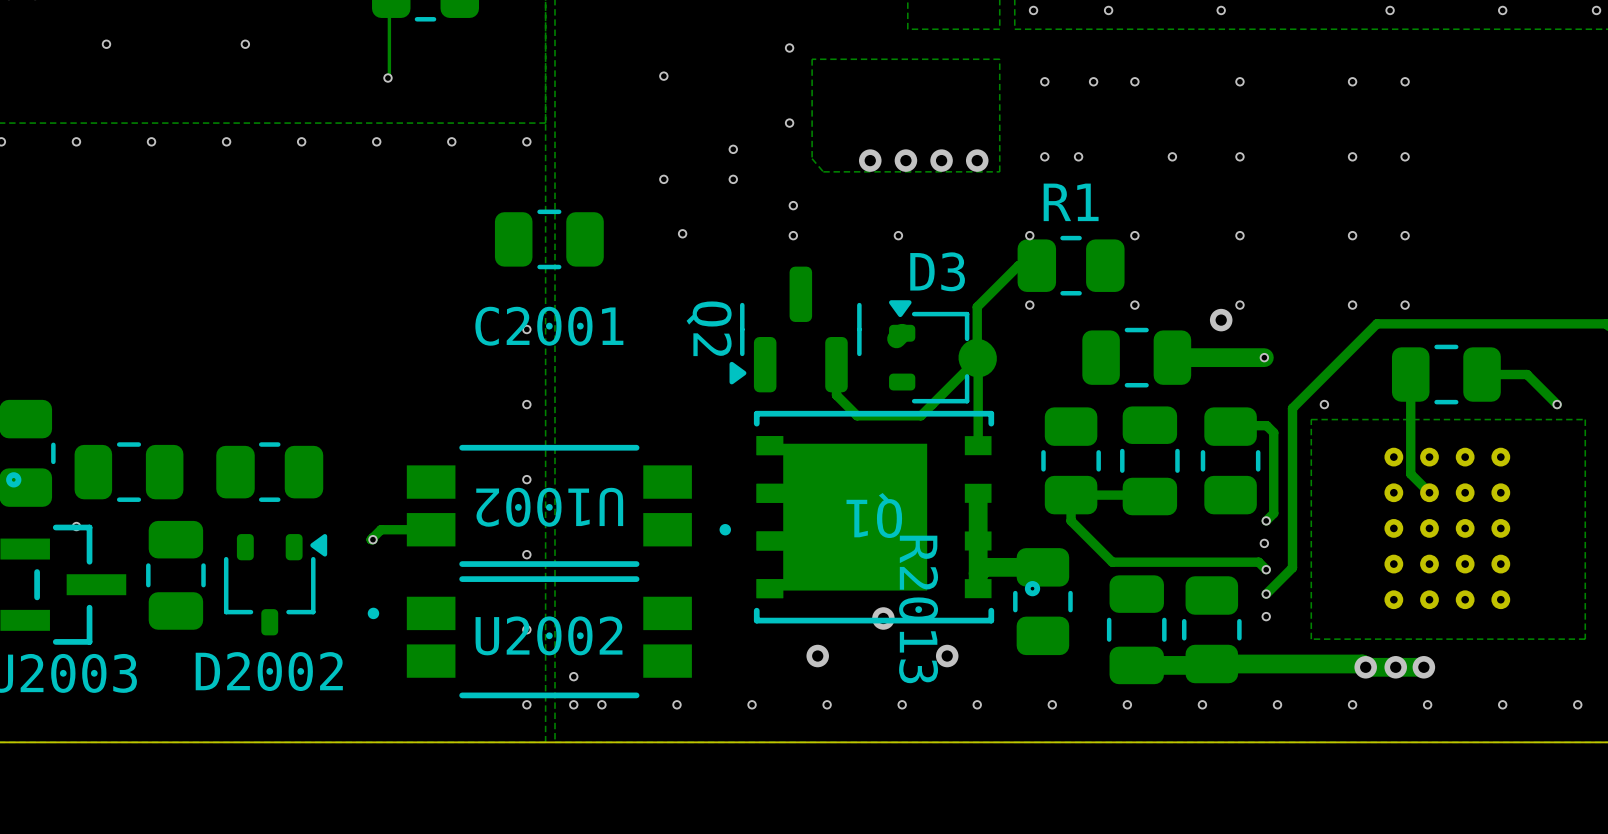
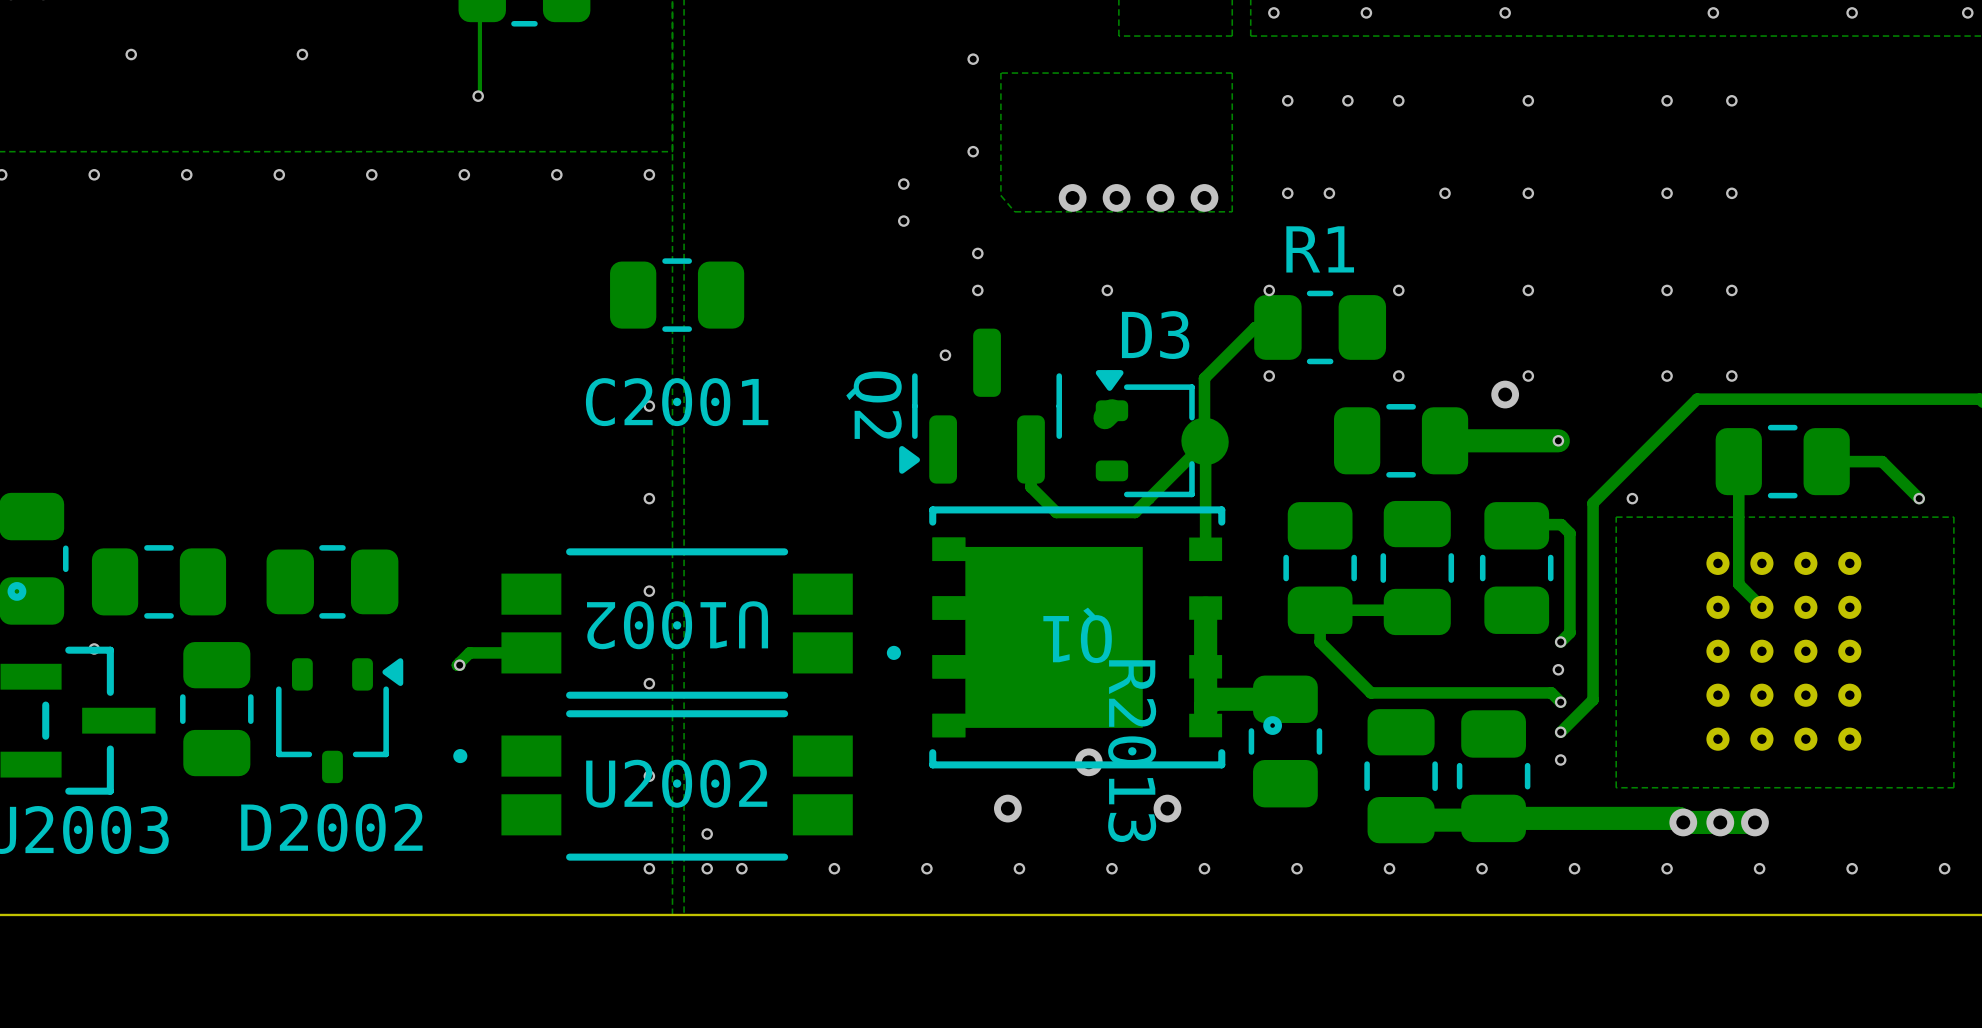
via: (663, 76) -> none
via: (663, 179) -> none
via: (682, 233) -> none
via: none -> (945, 355)

